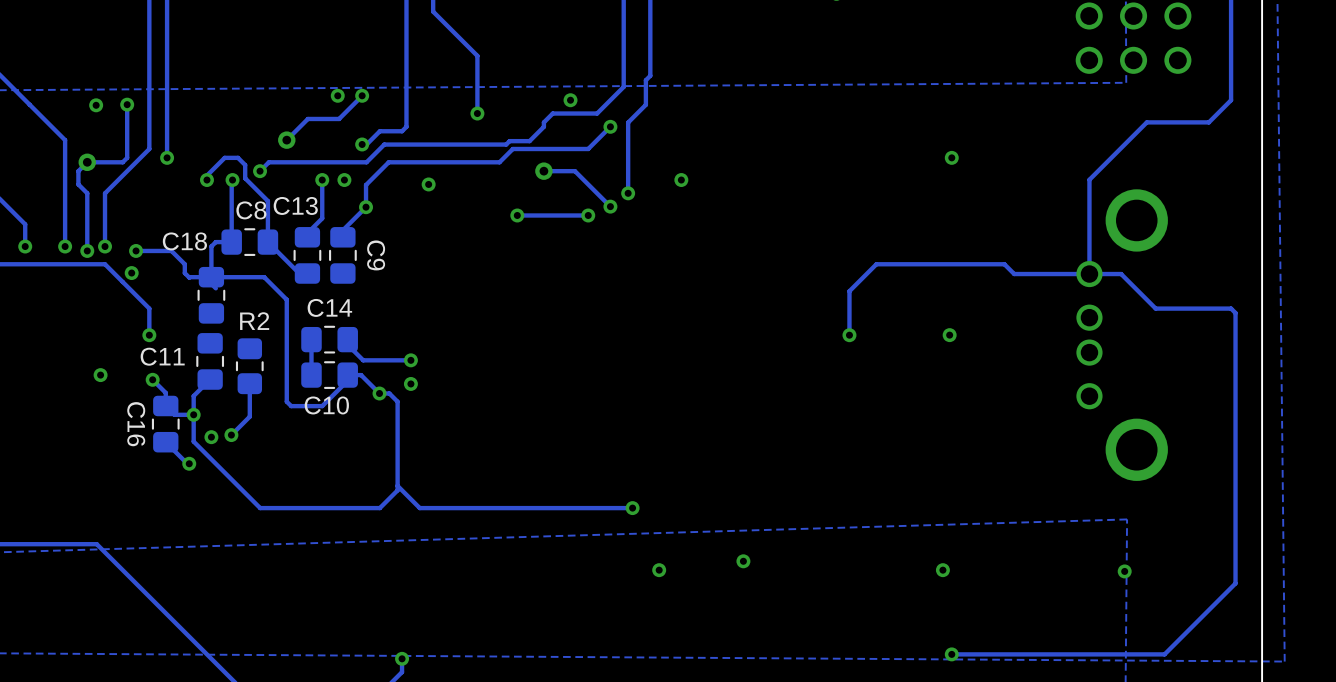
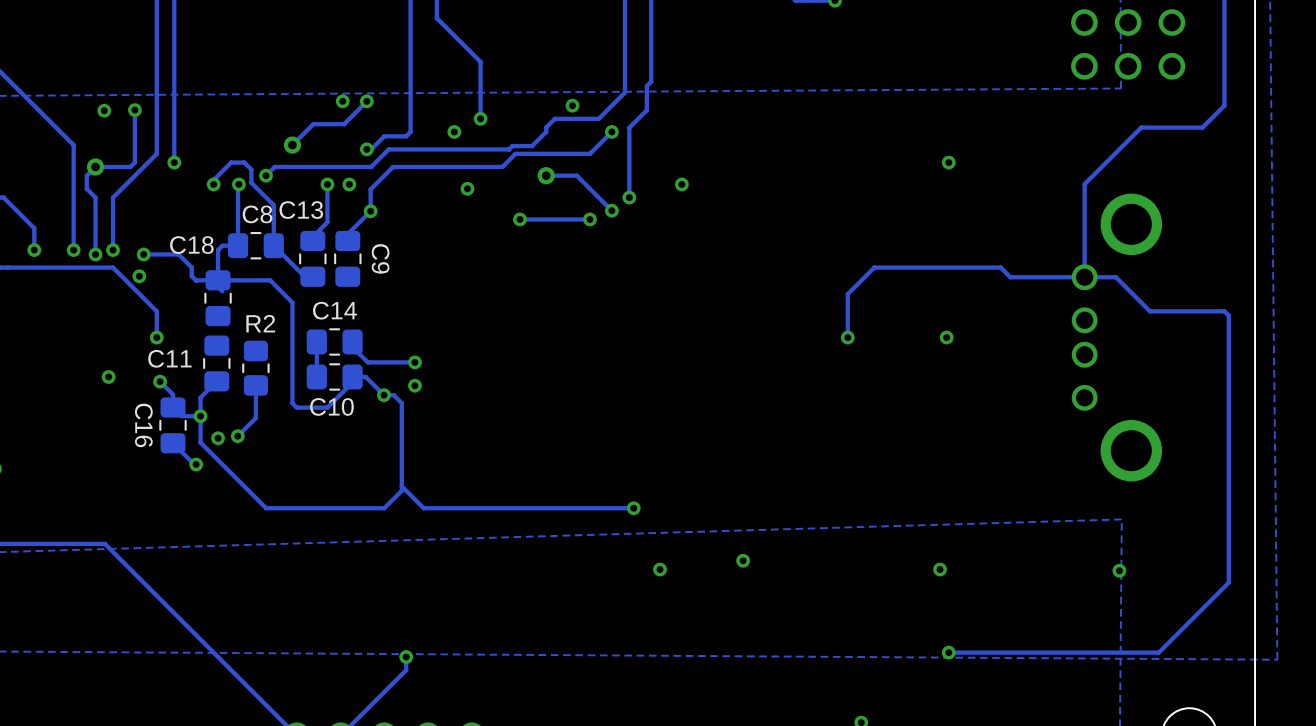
via: none -> (454, 131)
via: (428, 184) -> none
via: none -> (467, 188)

